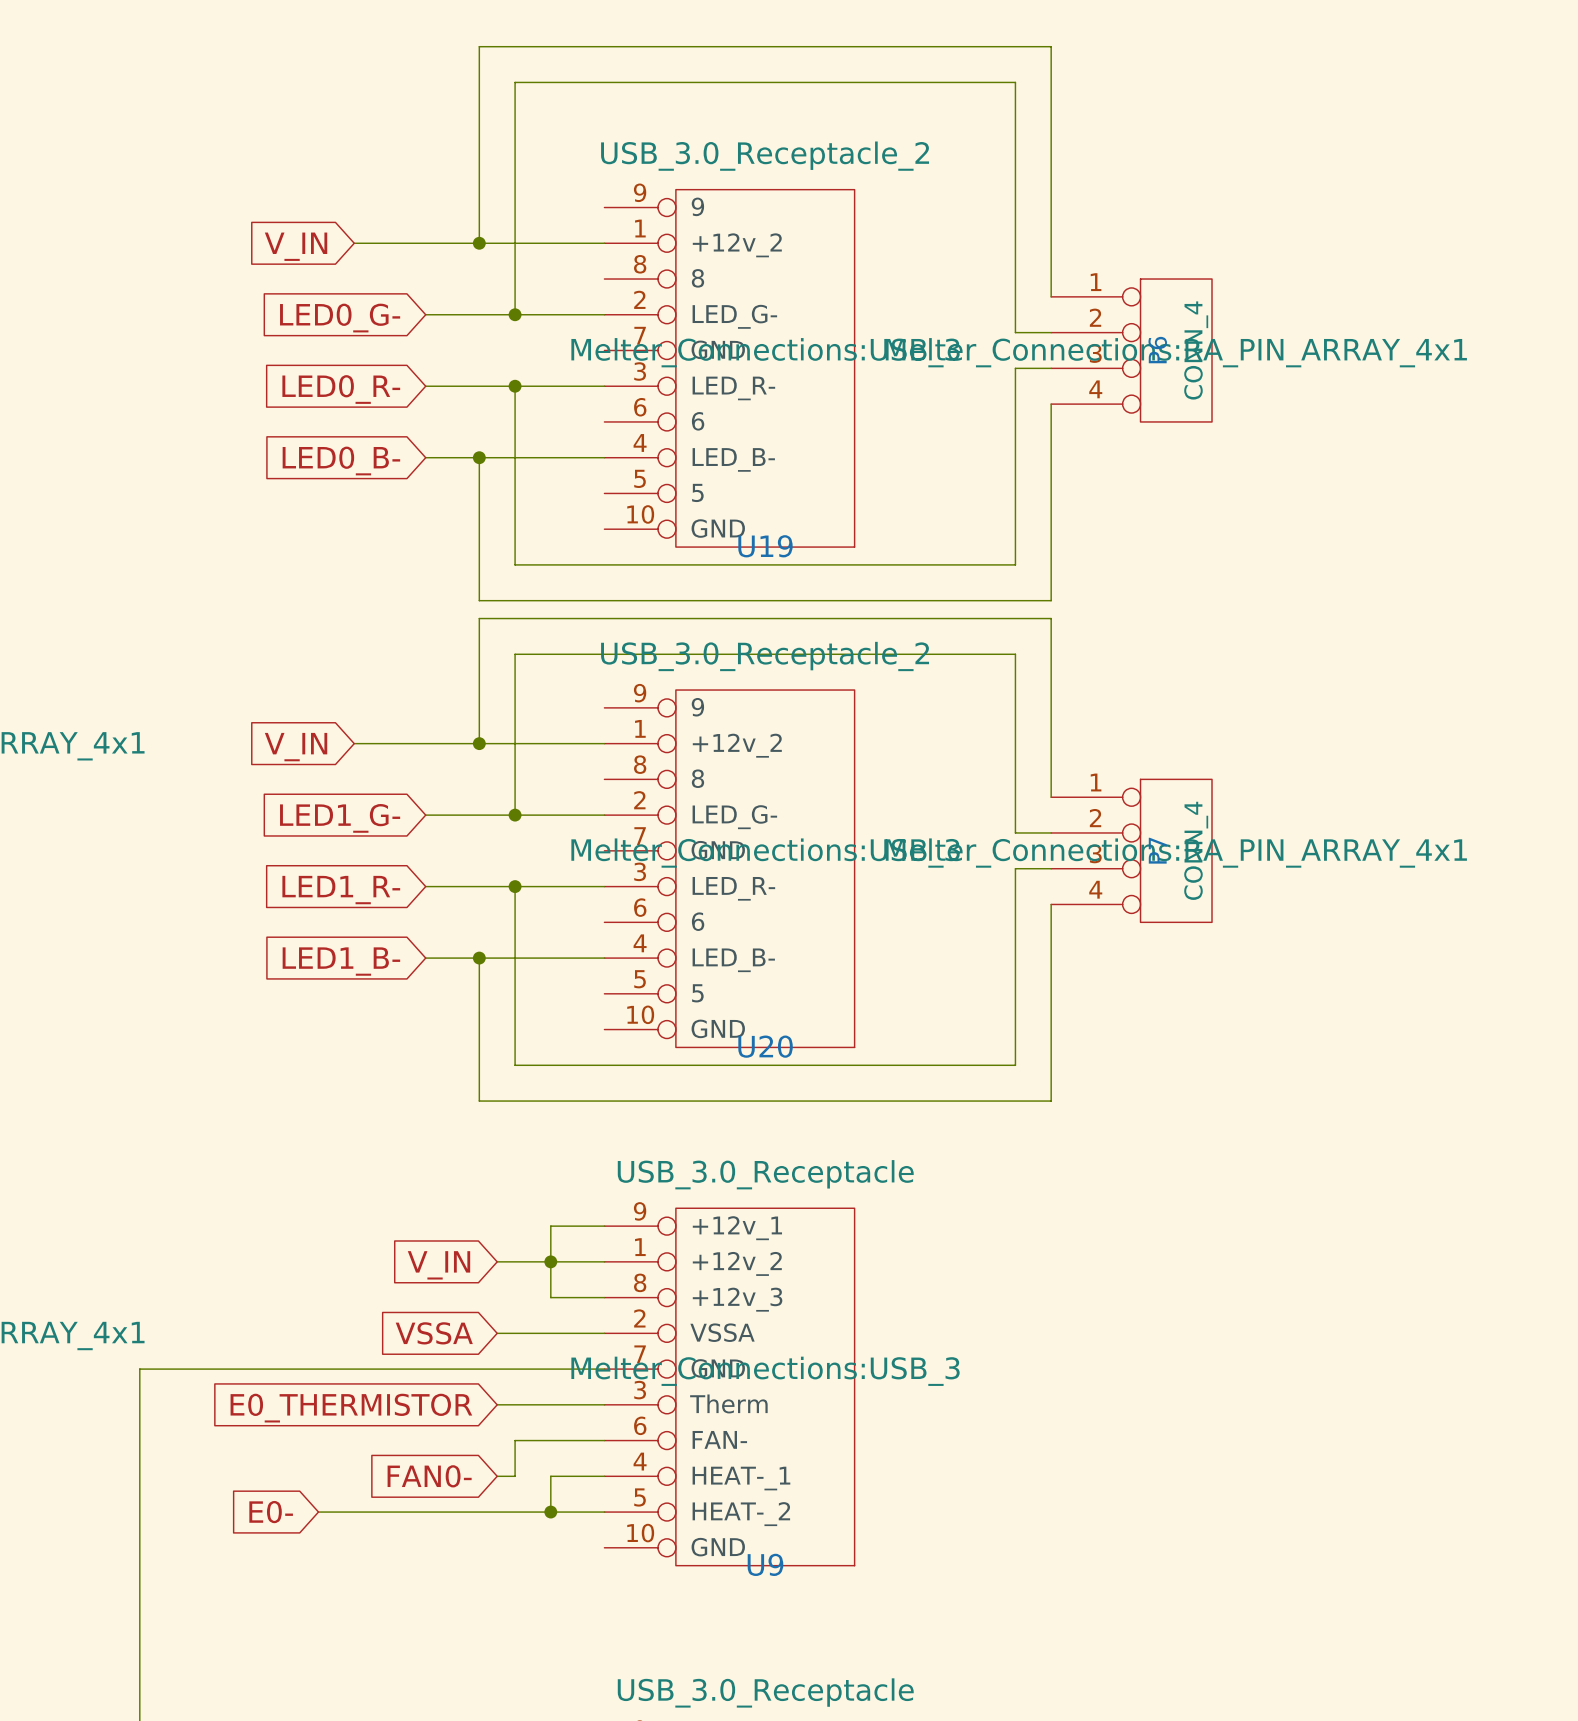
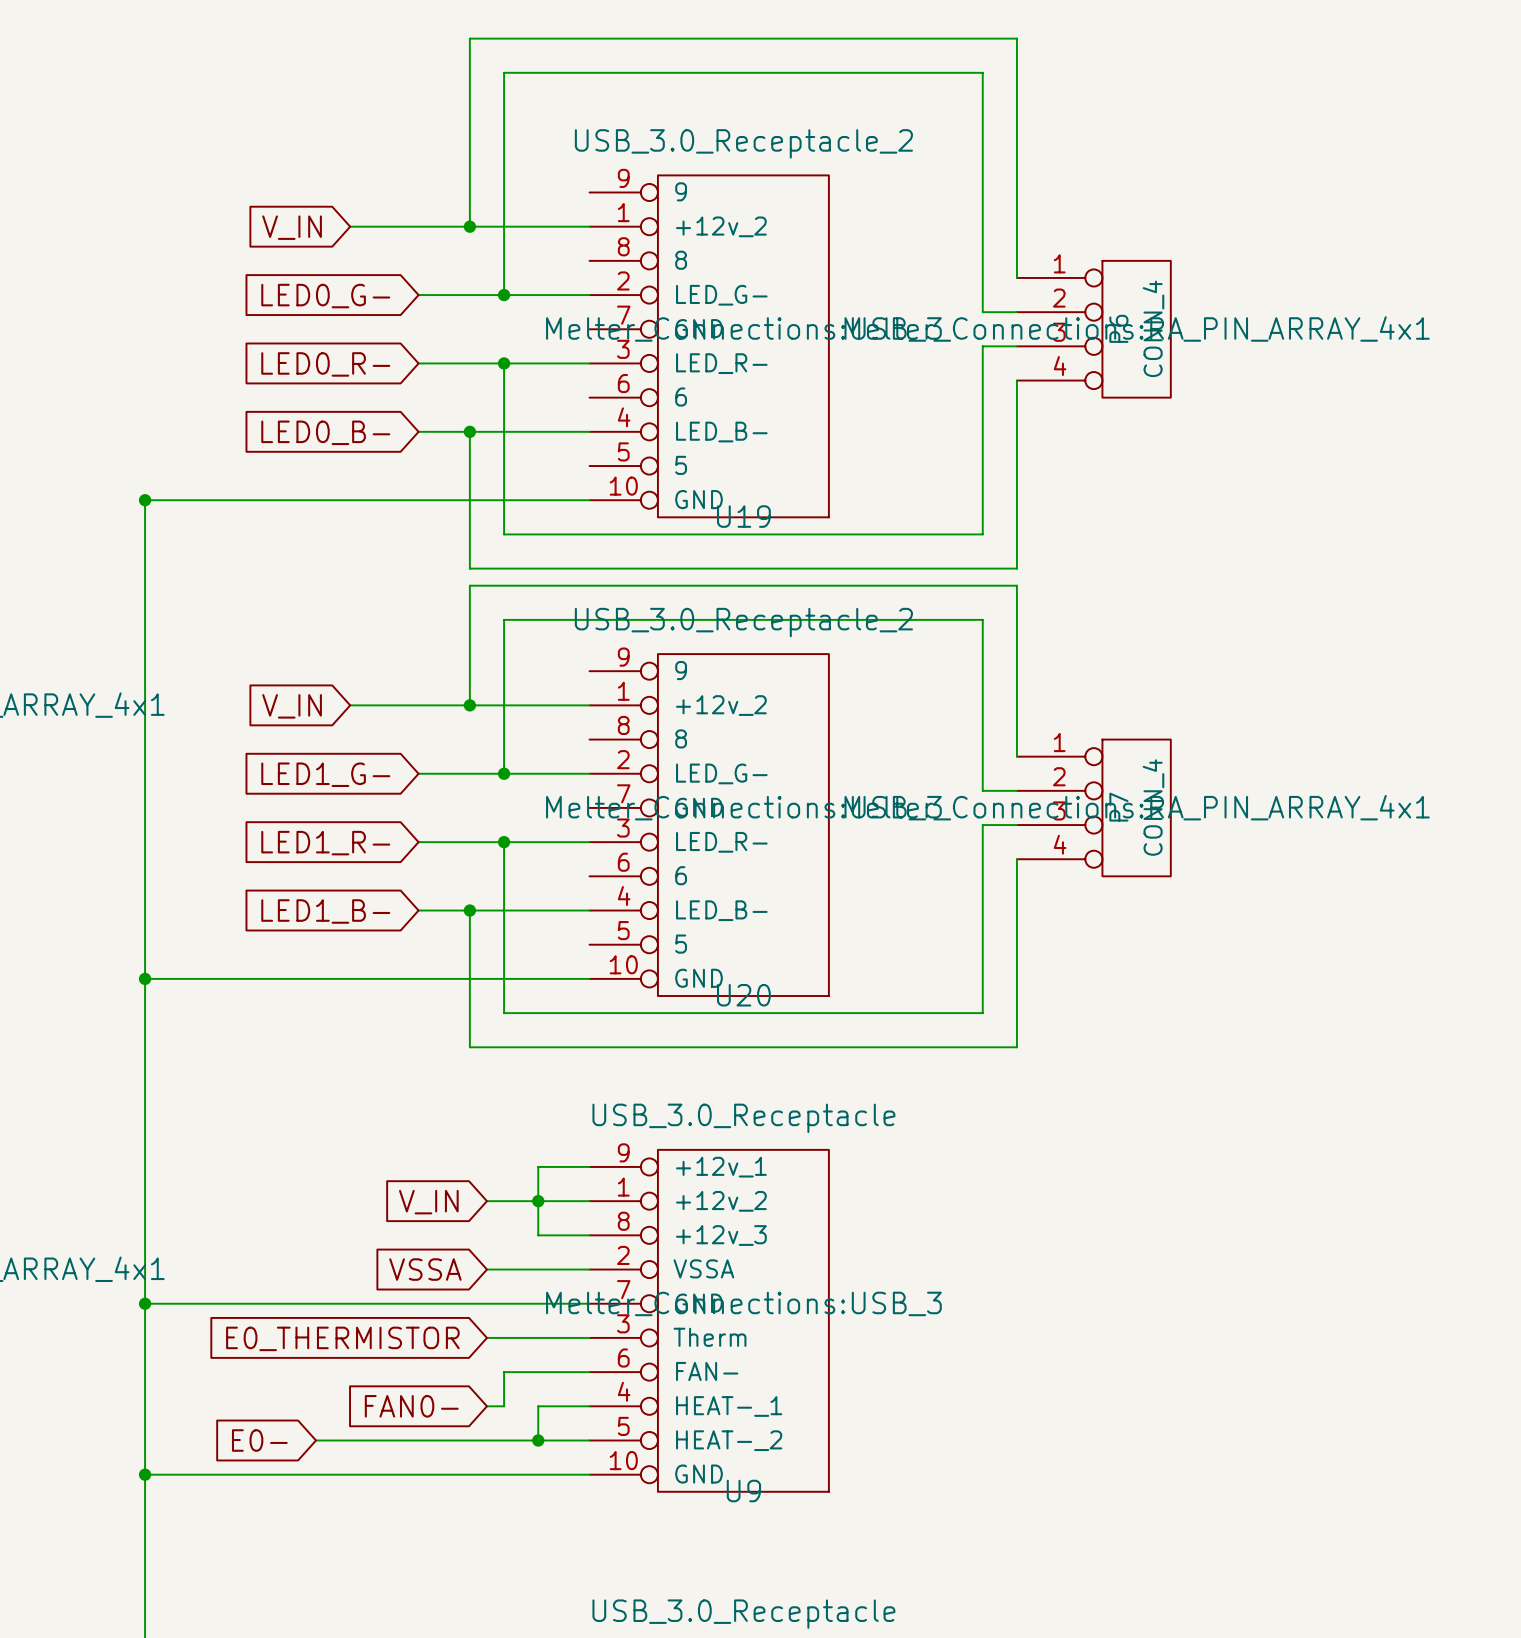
junction: none -> (145, 500)
wire: none -> (589, 500) (145, 500) (145, 1303)
wire: none -> (145, 978) (589, 978)
junction: none -> (145, 978)
junction: none -> (145, 1303)
wire: none -> (145, 1474) (589, 1474)
junction: none -> (145, 1474)

